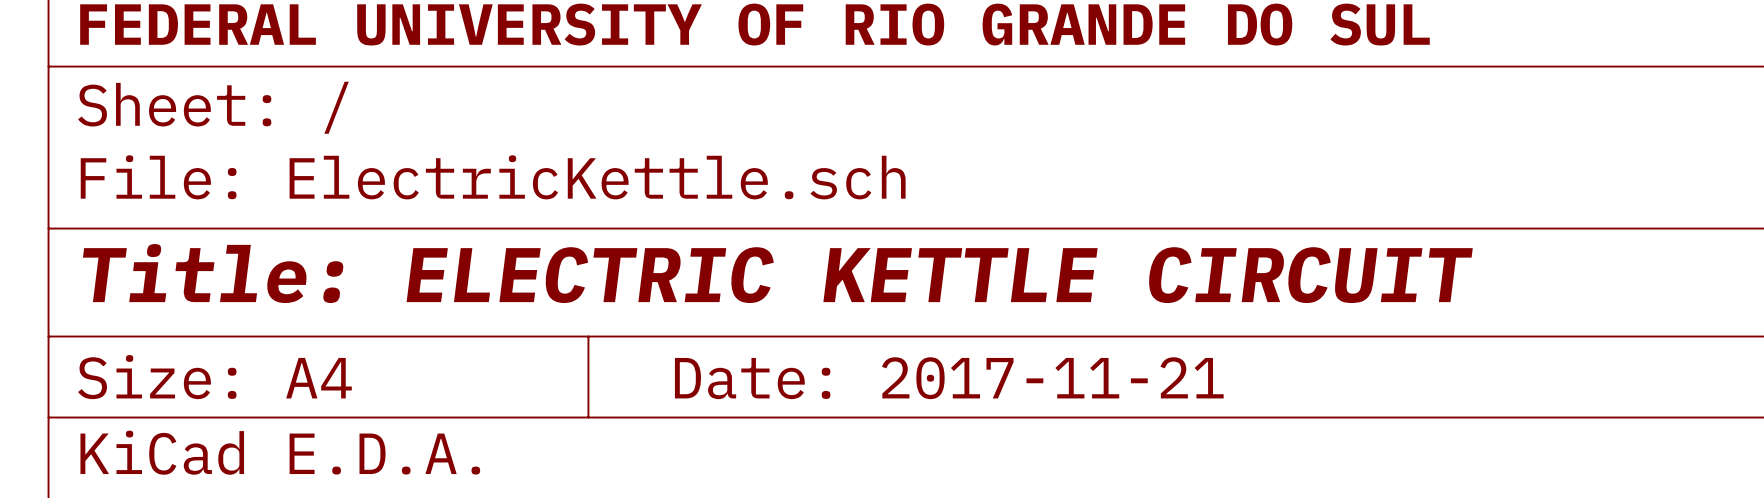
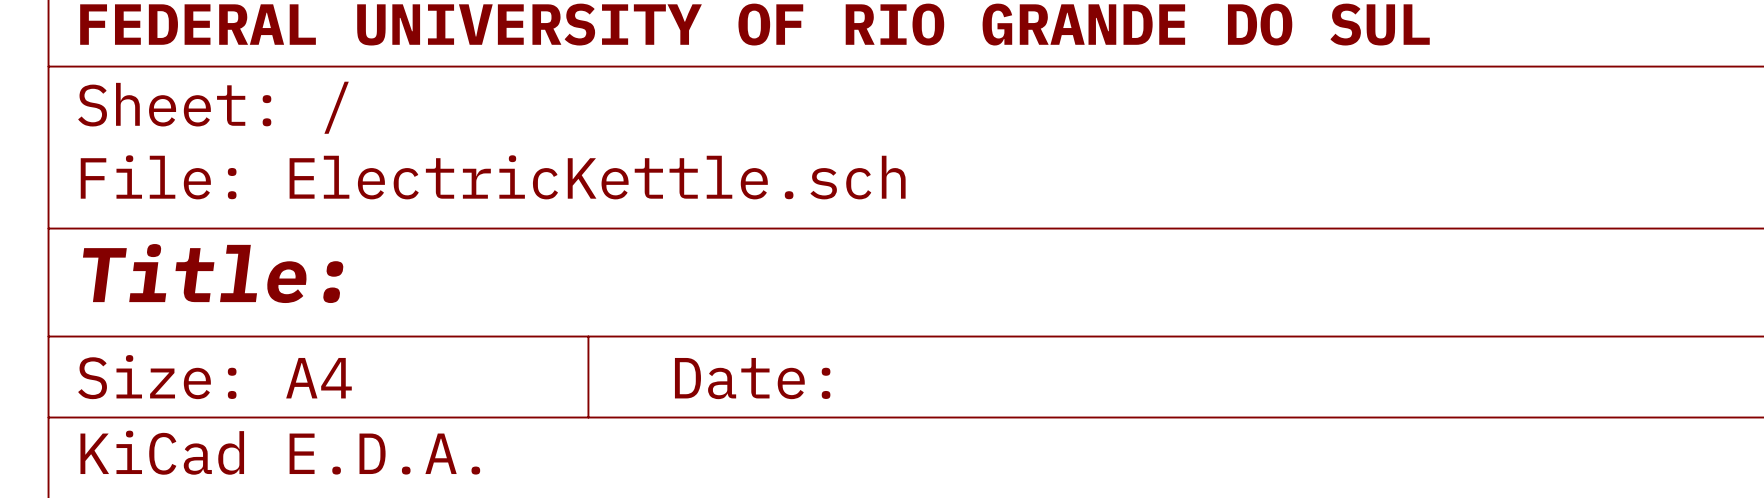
title block: Title: ELECTRIC KETTLE CIRCUIT (777, 273) -> Title: (213, 273)
title block: Date: 2017-11-21 (949, 378) -> Date: (752, 378)

